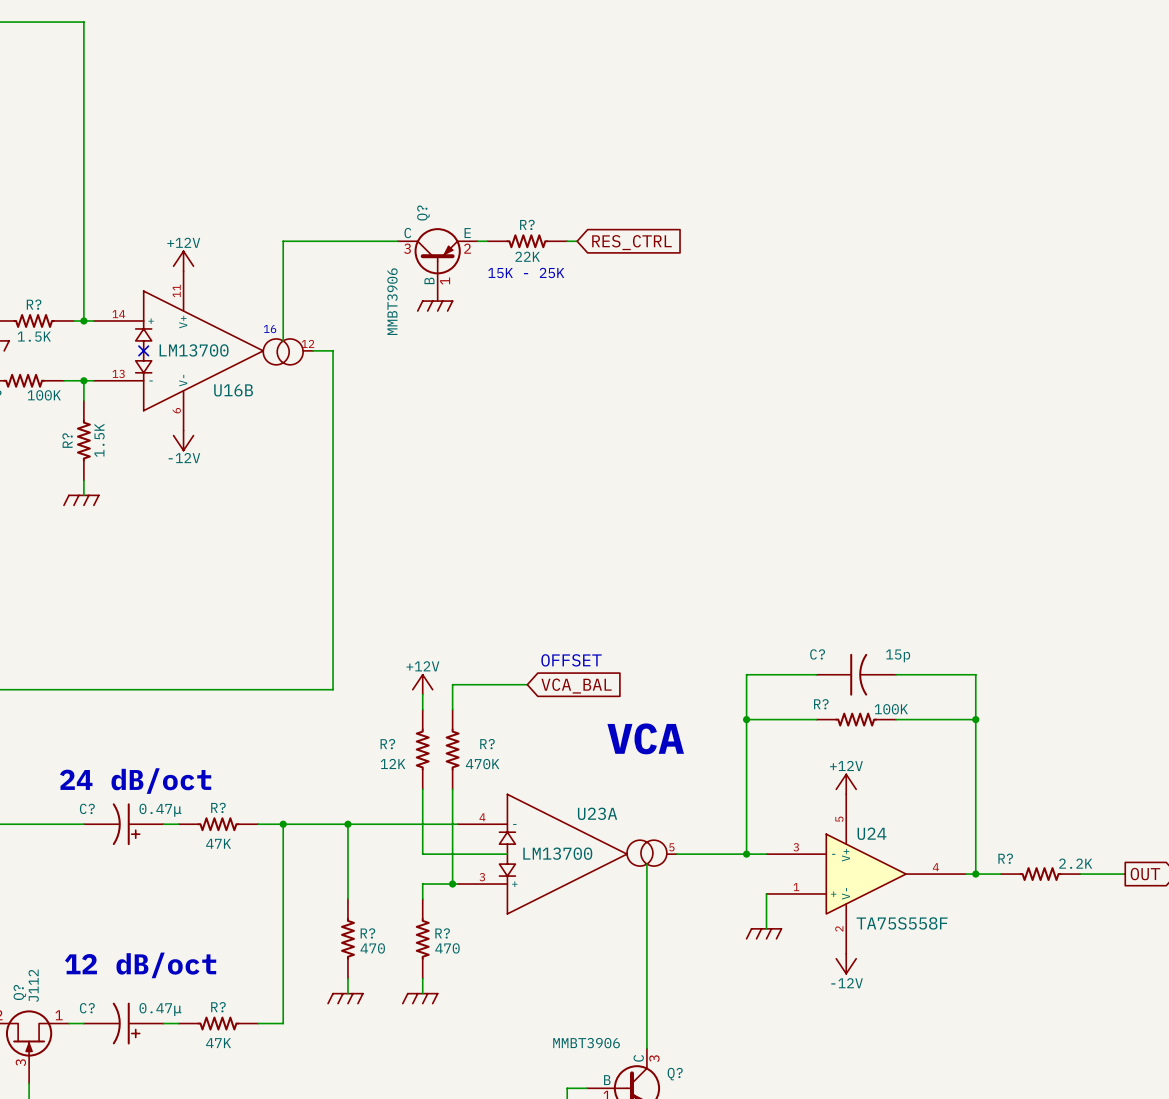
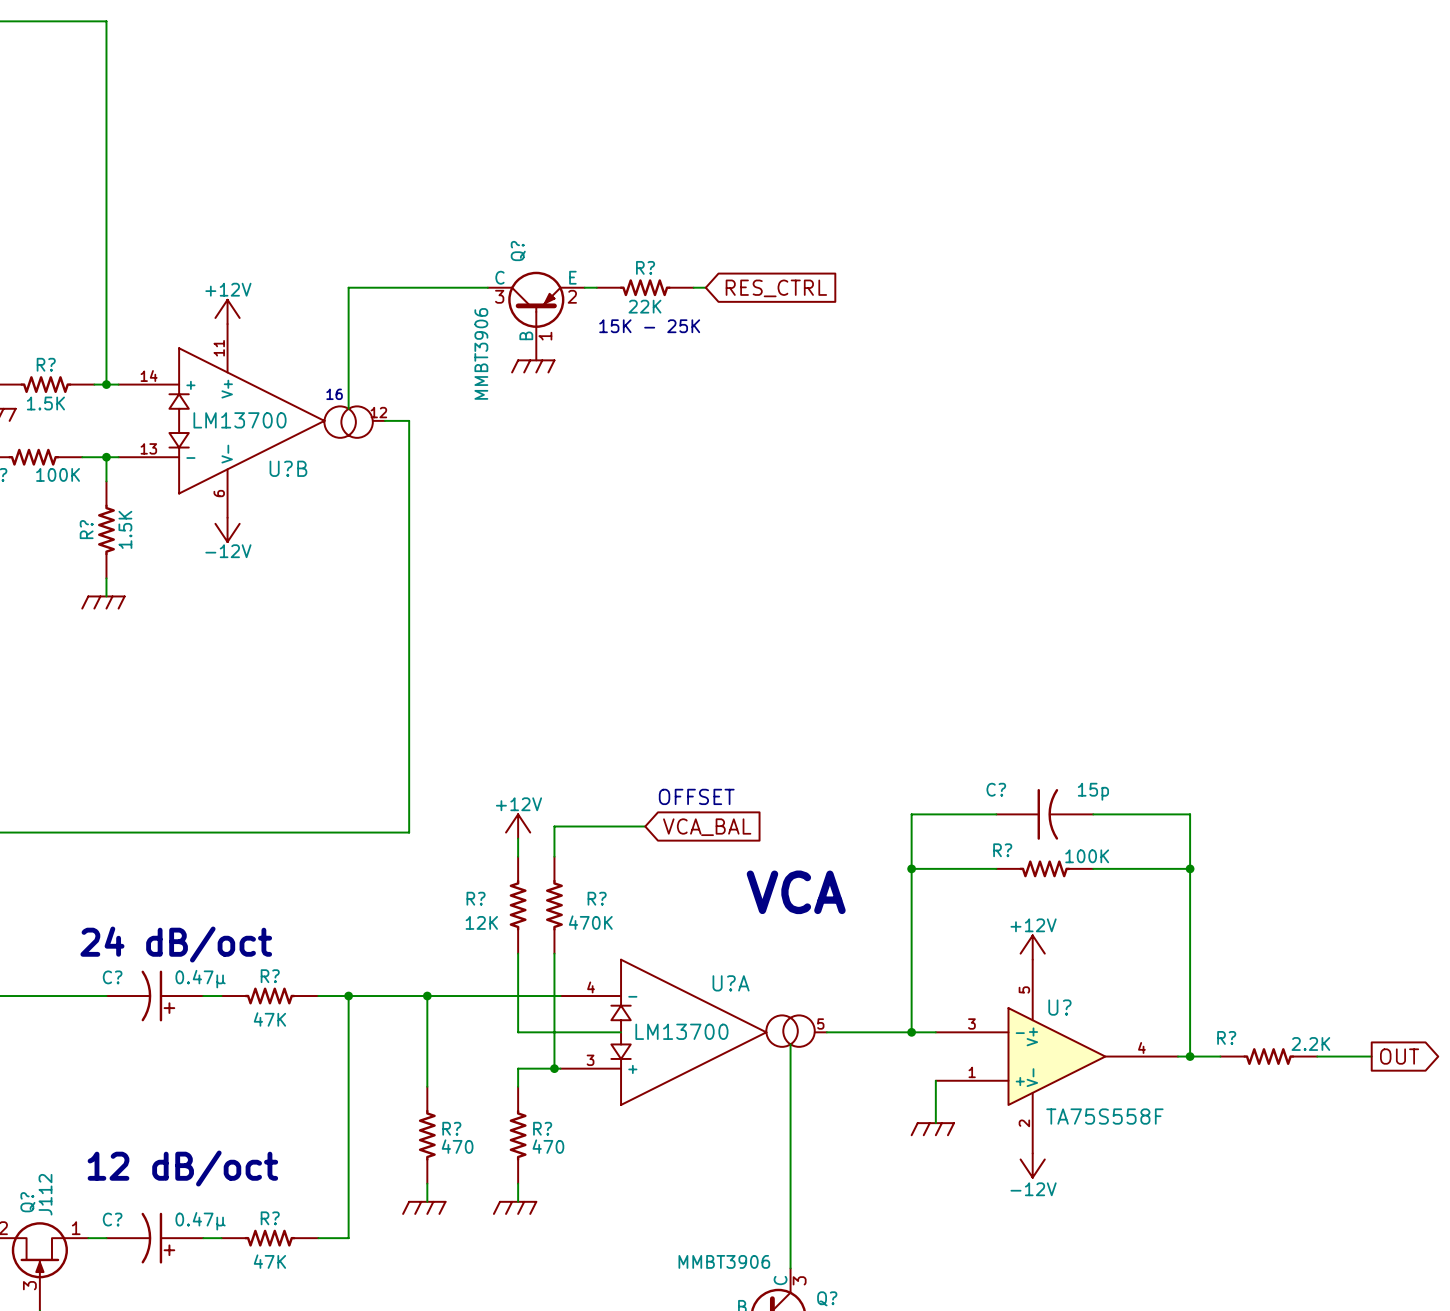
no-connect mark: (143, 350) -> none
U16B name: U16B (233, 390) -> U?B (288, 468)
U23A name: U23A (597, 813) -> U?A (731, 983)
U24 name: U24 (871, 833) -> U? (1059, 1007)

